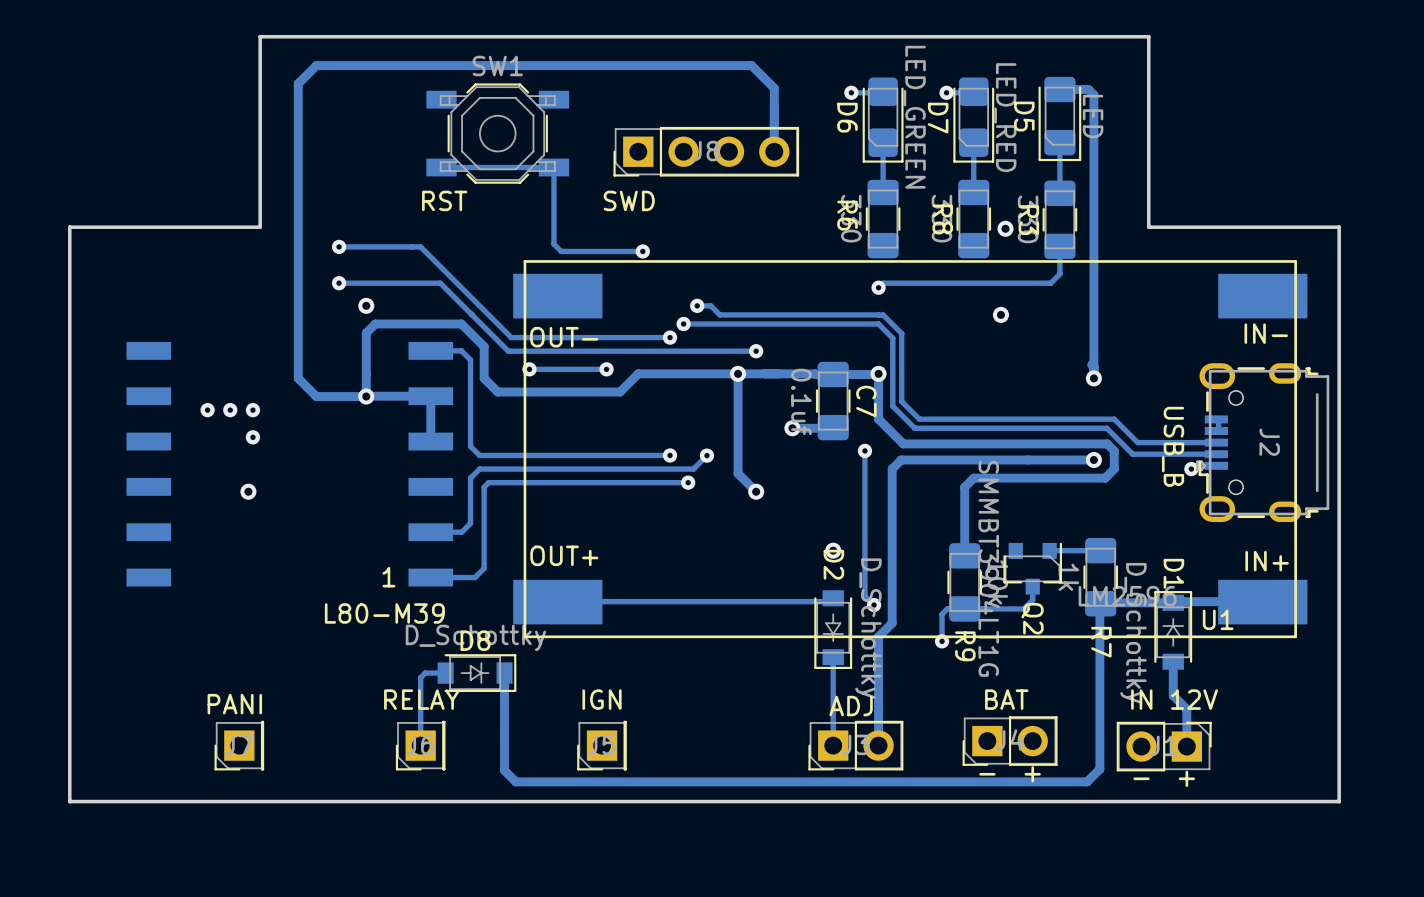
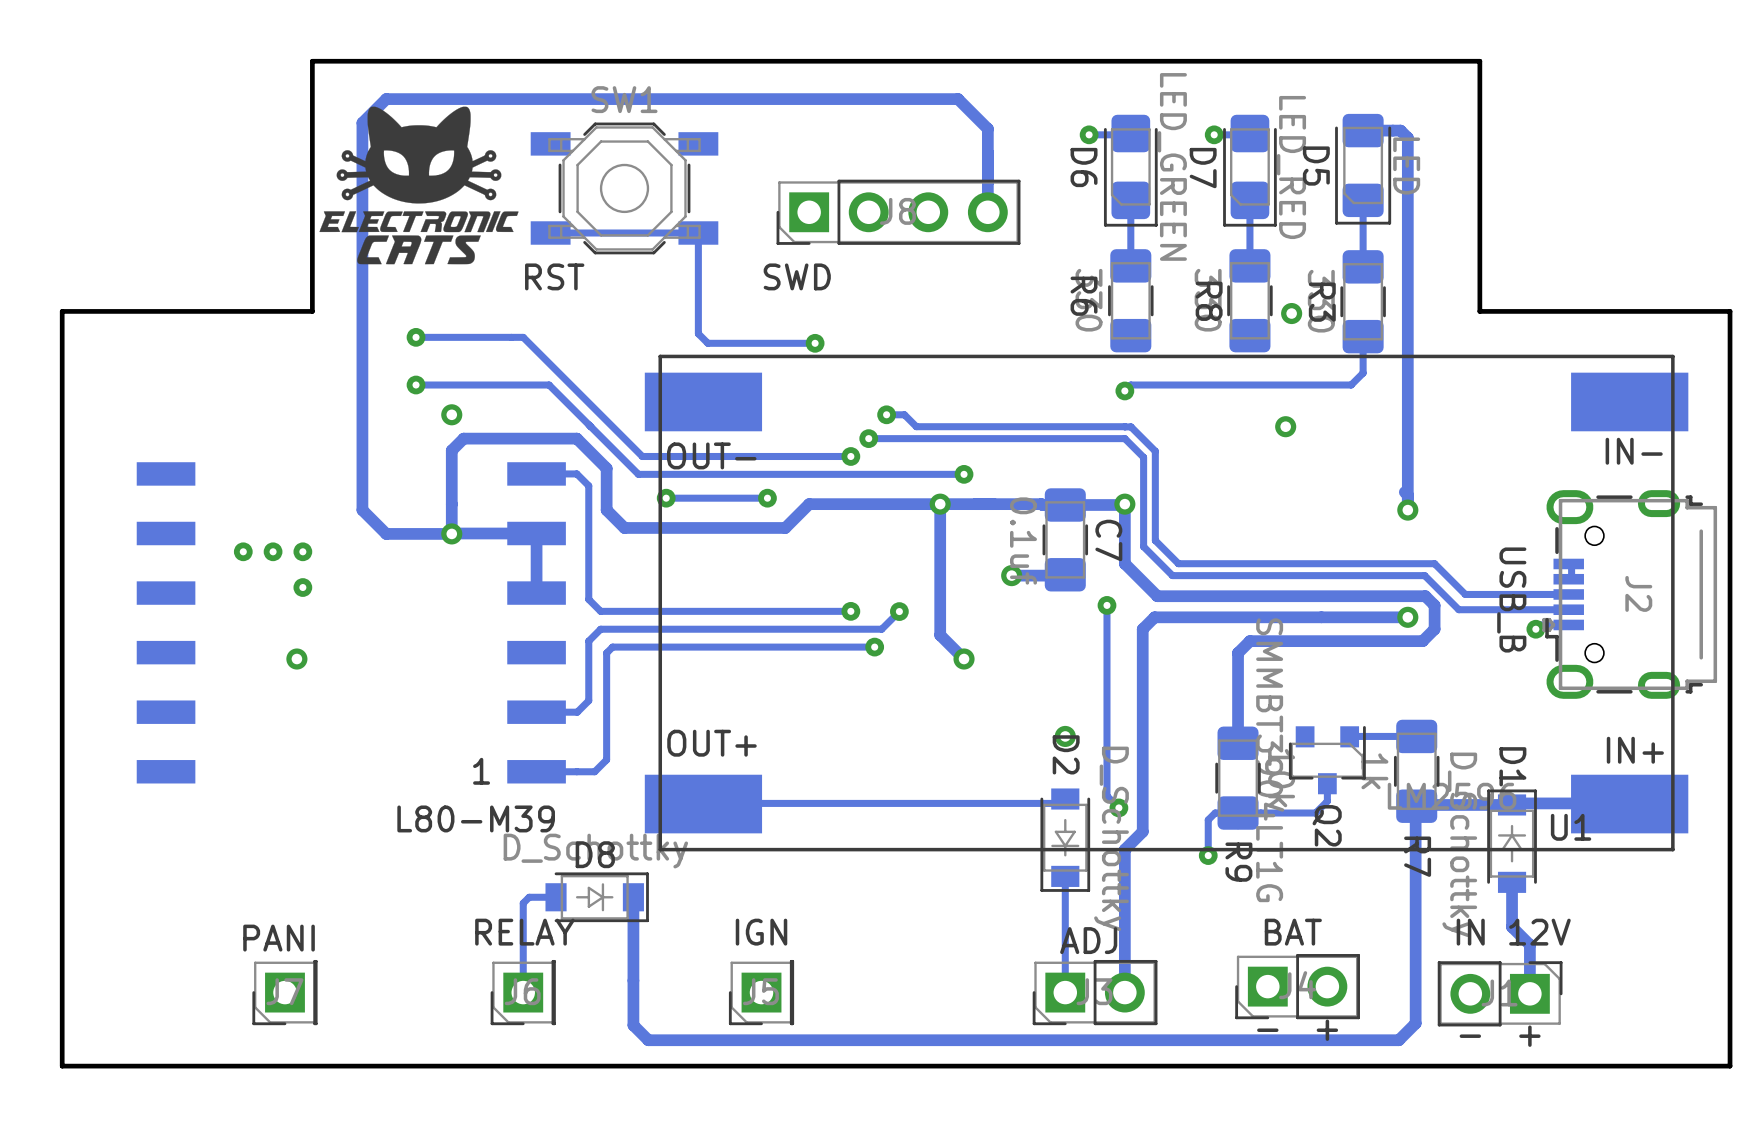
drawing: none -> [319, 106, 519, 265]

